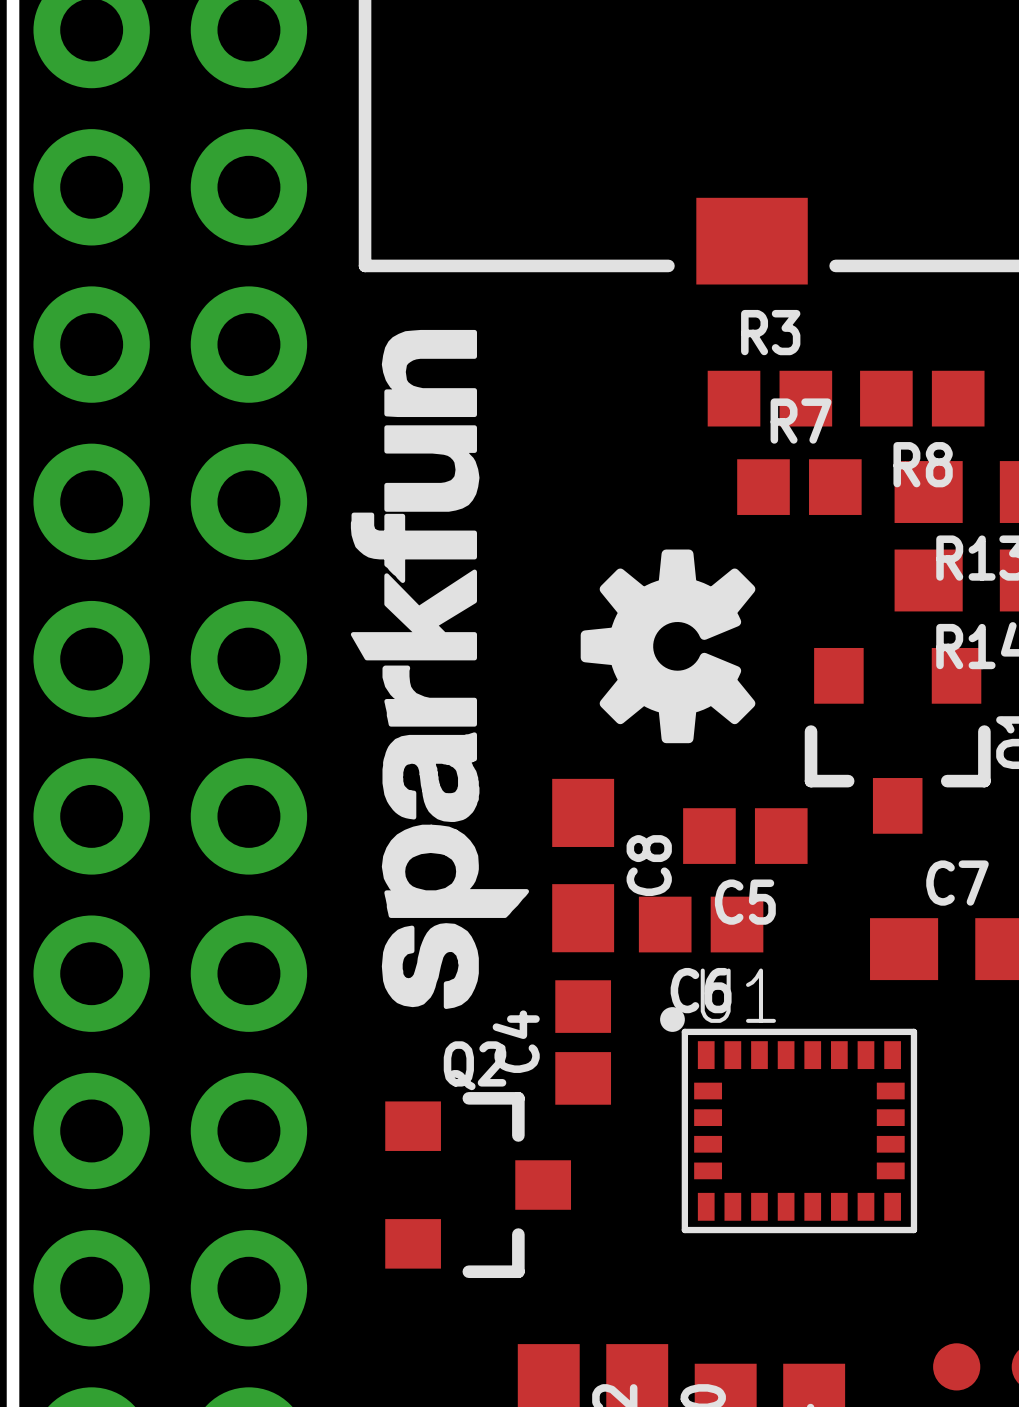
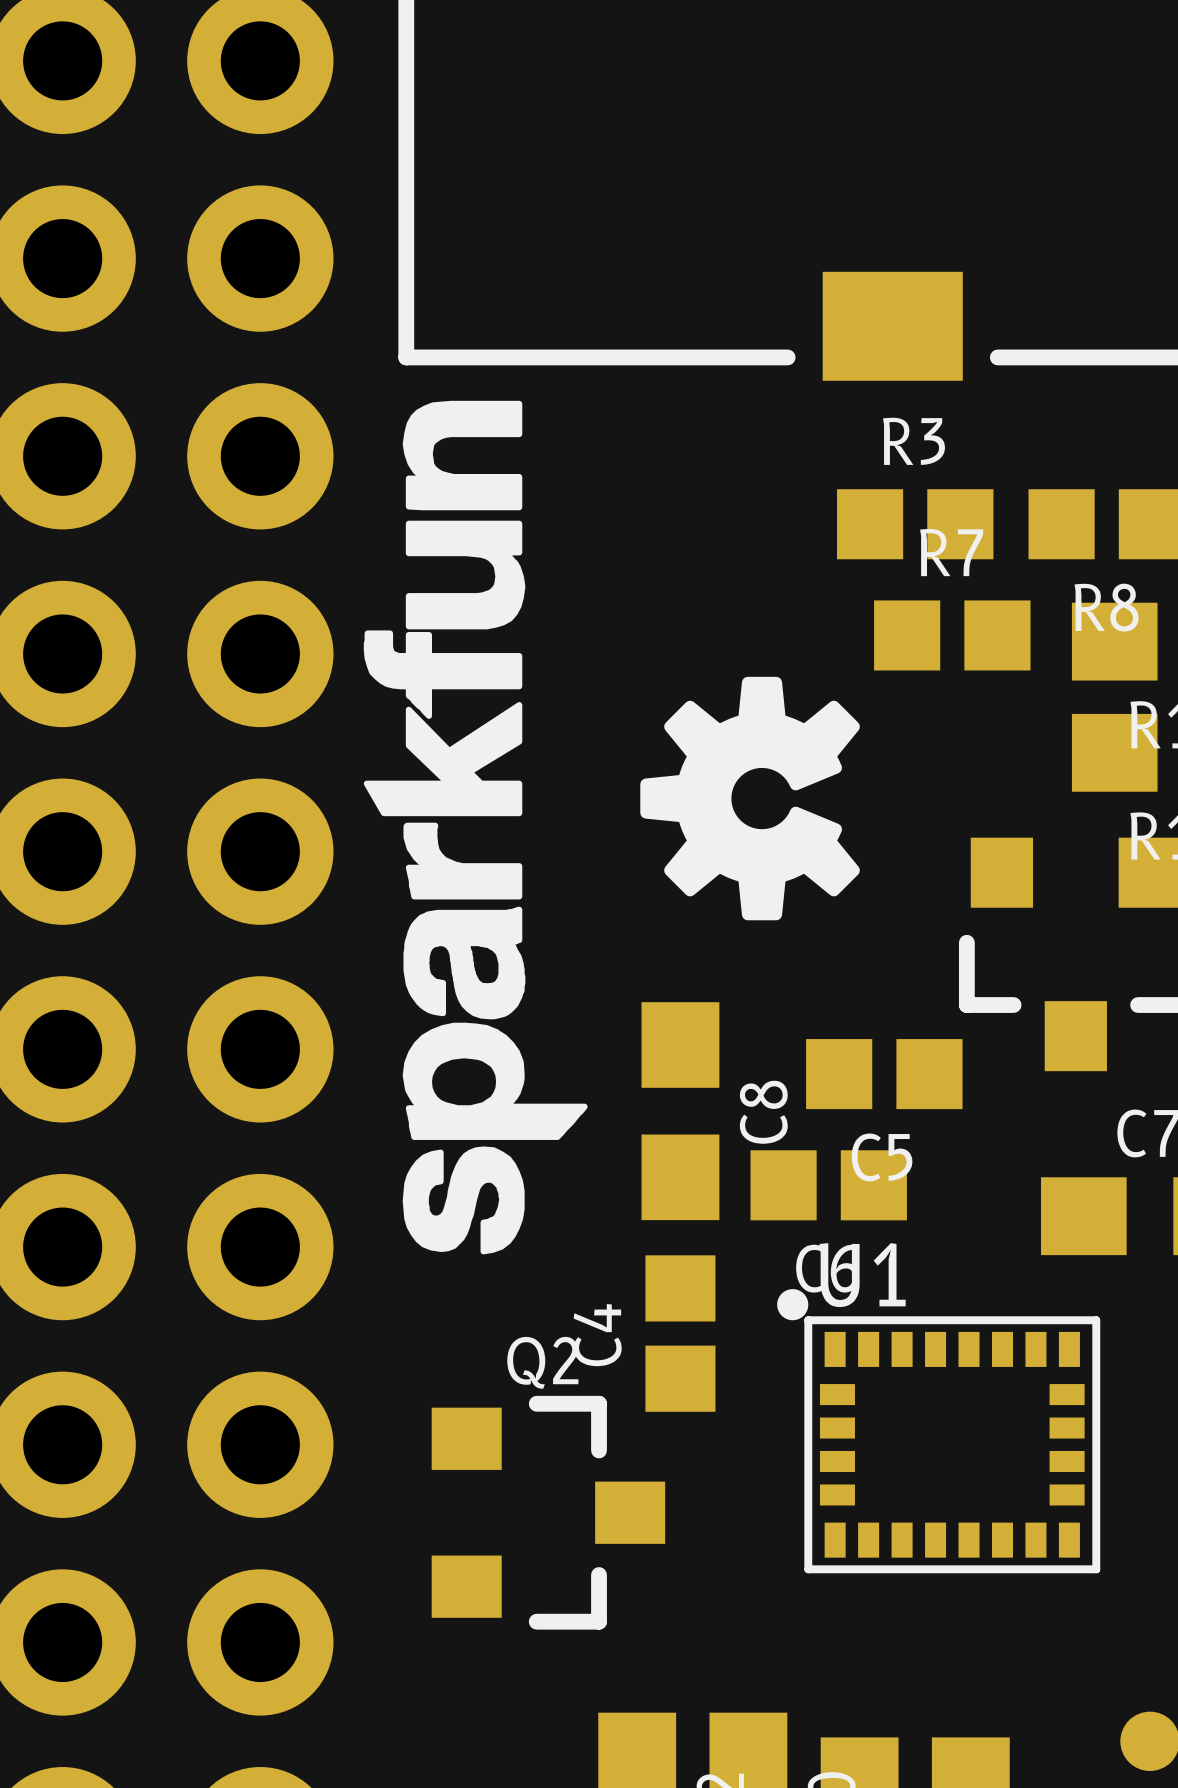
drawing position: (668, 646) -> (750, 798)
drawing position: (439, 669) -> (475, 827)

